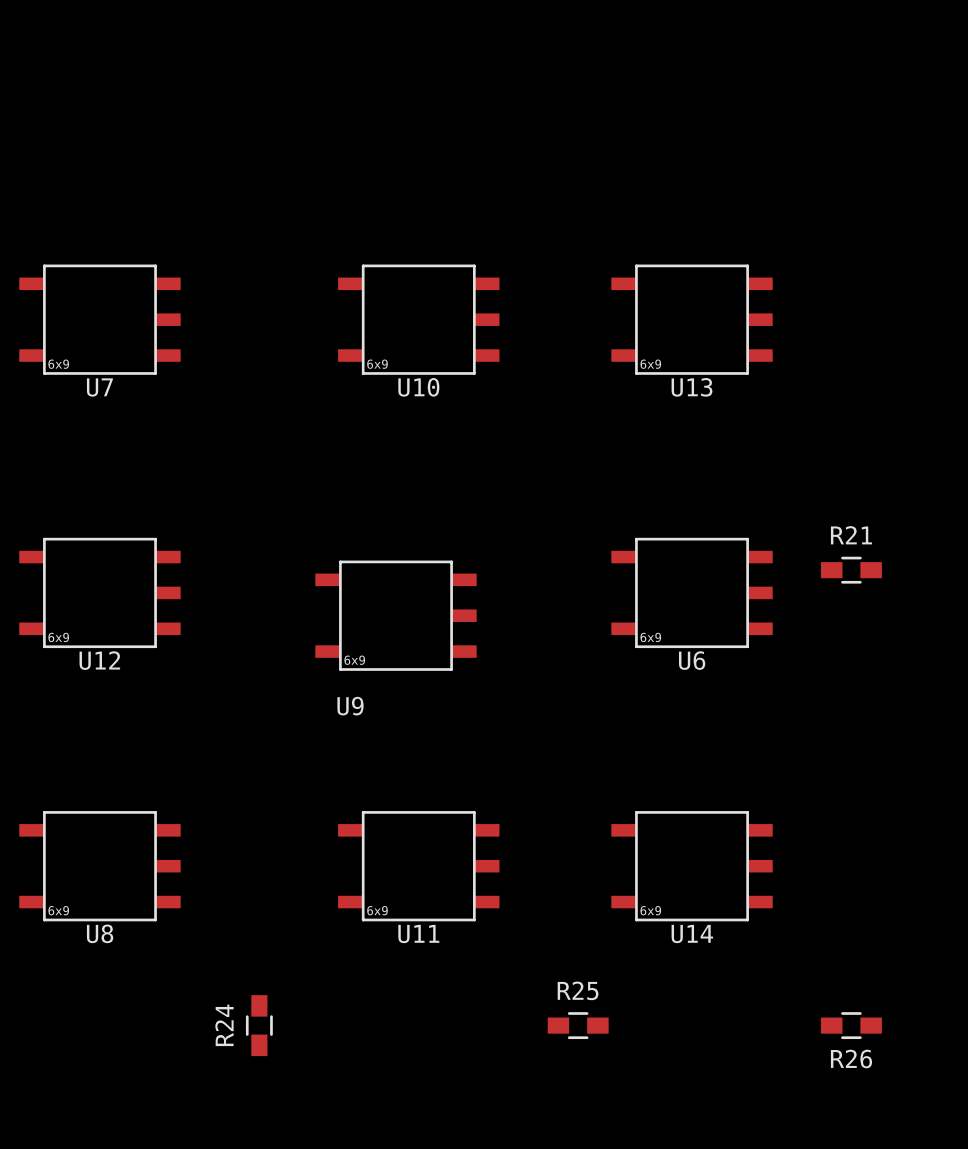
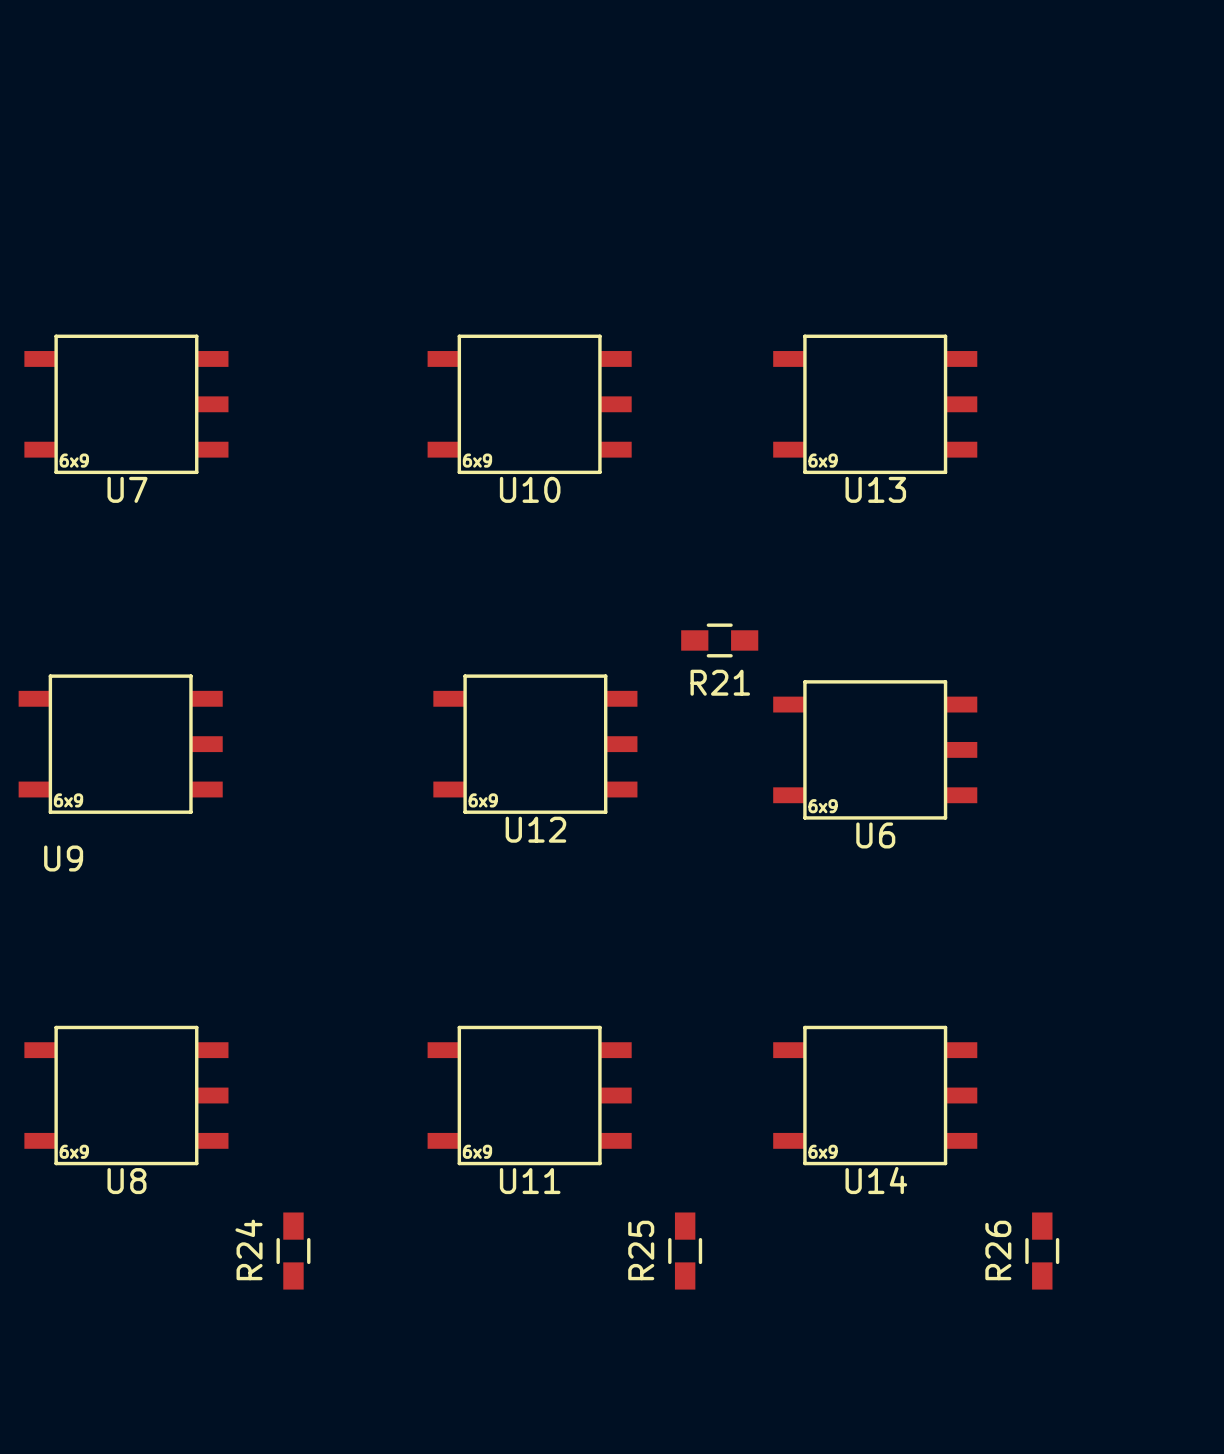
R21 name position: R21 (851, 535) -> R21 (720, 682)
R21 position: (851, 570) -> (719, 640)
U12 position: (99, 592) -> (535, 744)
U9 position: (396, 615) -> (120, 744)
R25 name position: R25 (578, 990) -> R25 (641, 1250)
R24 position: (259, 1025) -> (293, 1251)
R25 rotation: 0° (578, 1025) -> 90° clockwise (685, 1251)
R25 position: (578, 1025) -> (685, 1251)
R26 rotation: 0° (851, 1025) -> 90° clockwise (1042, 1251)
R26 position: (851, 1025) -> (1042, 1251)

